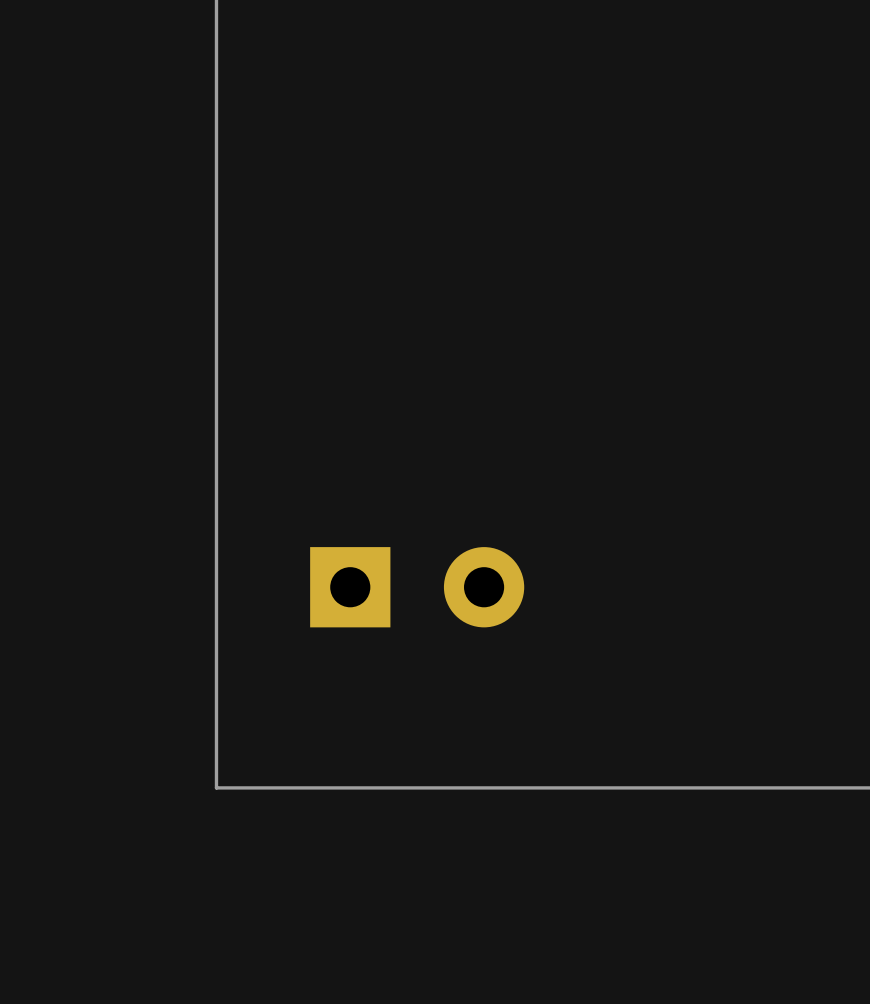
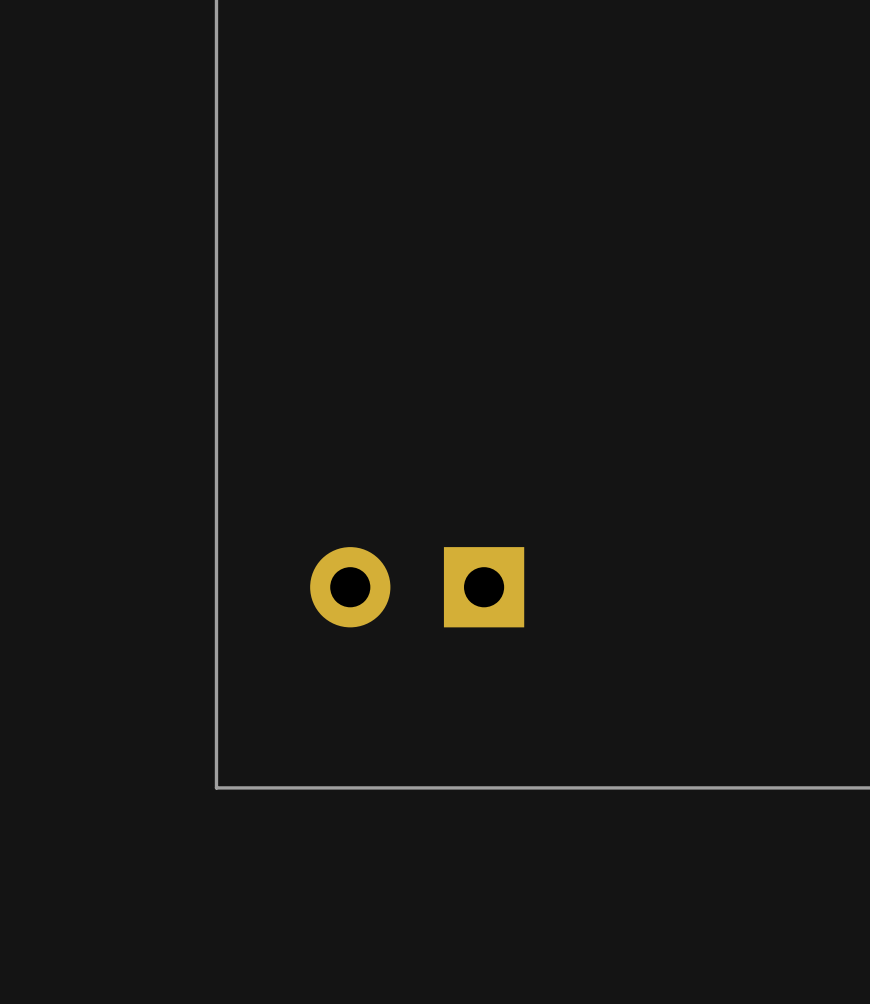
part rotation: 0° (417, 587) -> 180° (417, 587)

